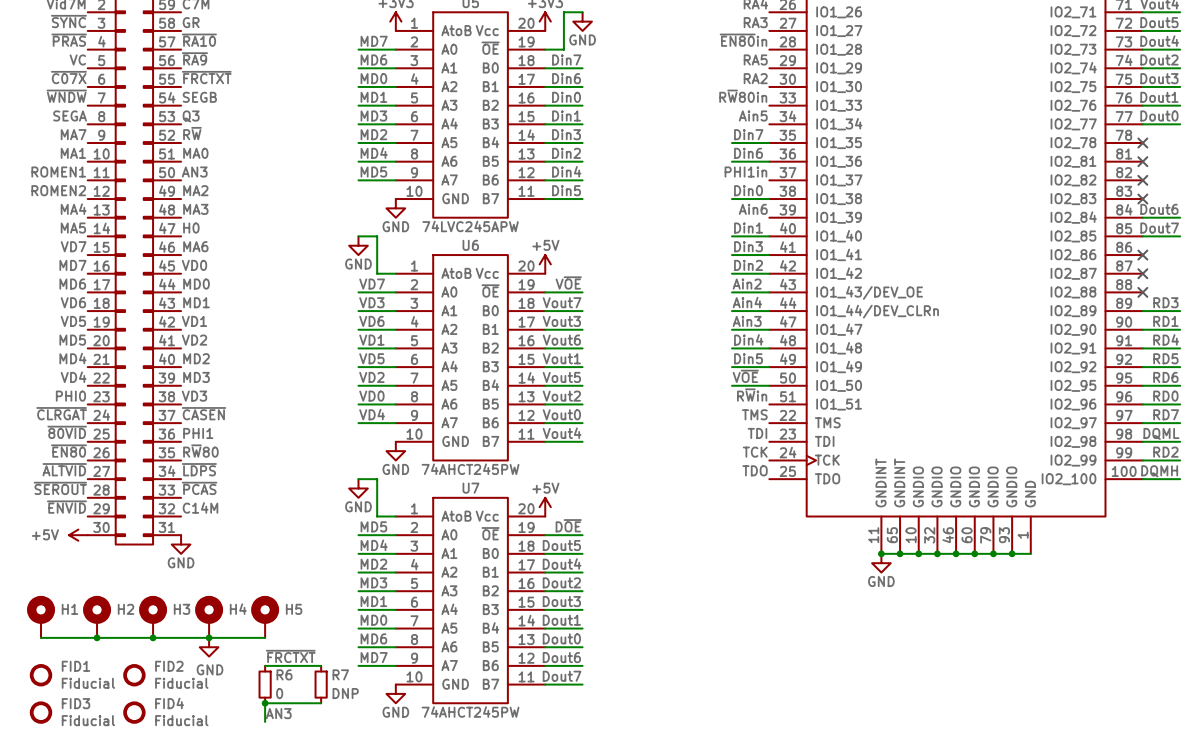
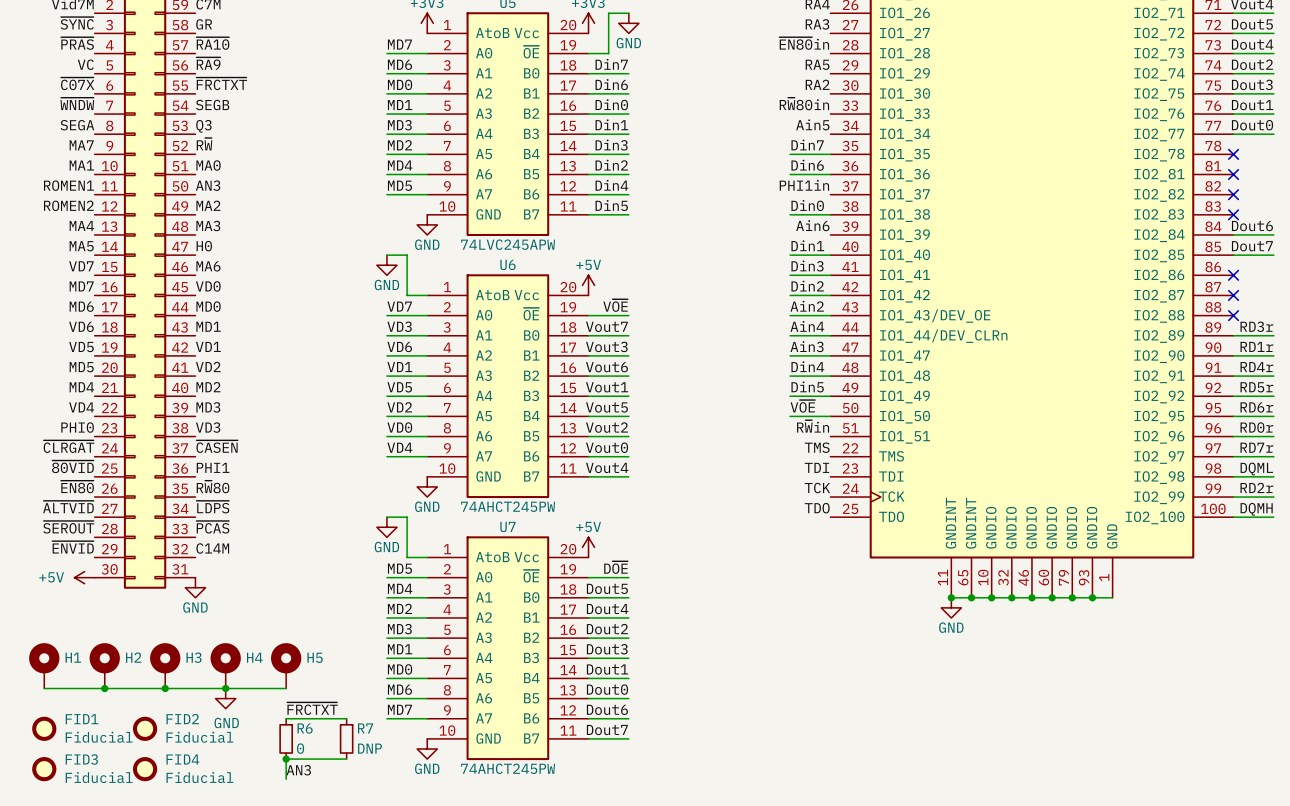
label: RD3 (1165, 302) -> RD3r (1256, 326)
label: RD1 (1165, 321) -> RD1r (1256, 346)
label: RD4 (1166, 339) -> RD4r (1256, 367)
label: RD5 (1165, 358) -> RD5r (1256, 387)
label: RD6 (1165, 377) -> RD6r (1256, 407)
label: RD0 (1165, 396) -> RD0r (1256, 427)
label: RD7 (1166, 414) -> RD7r (1256, 447)
label: RD2 (1165, 452) -> RD2r (1256, 487)

